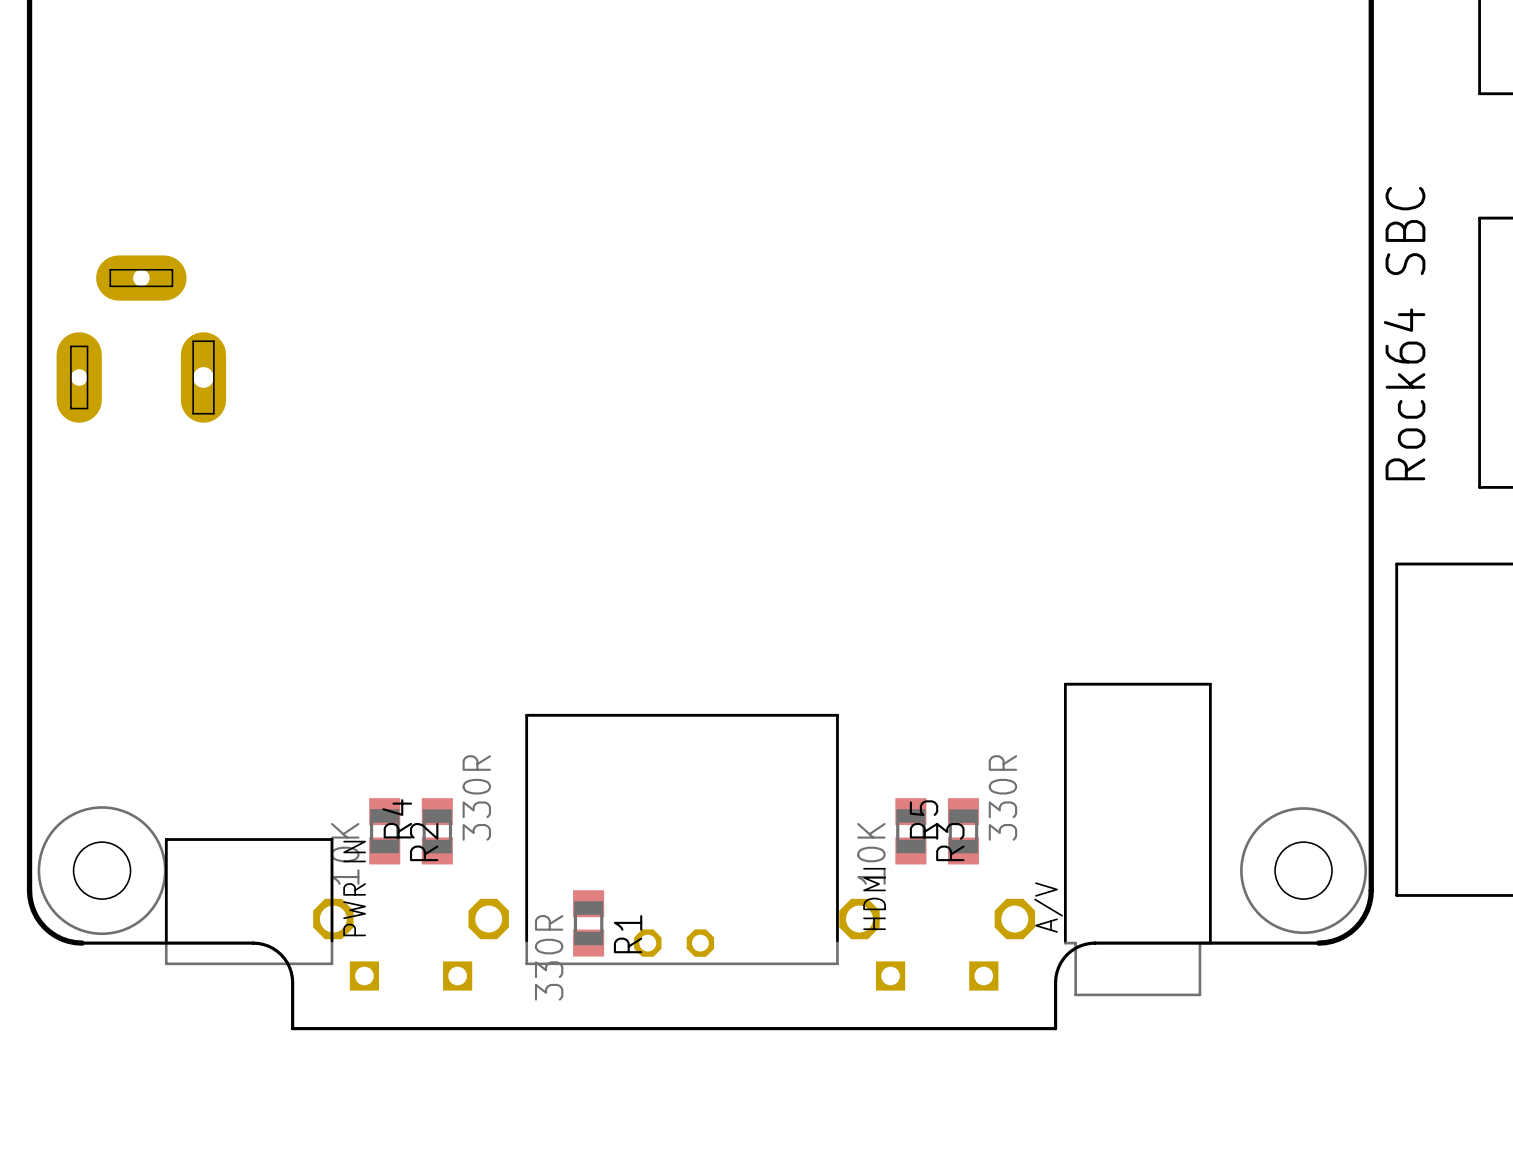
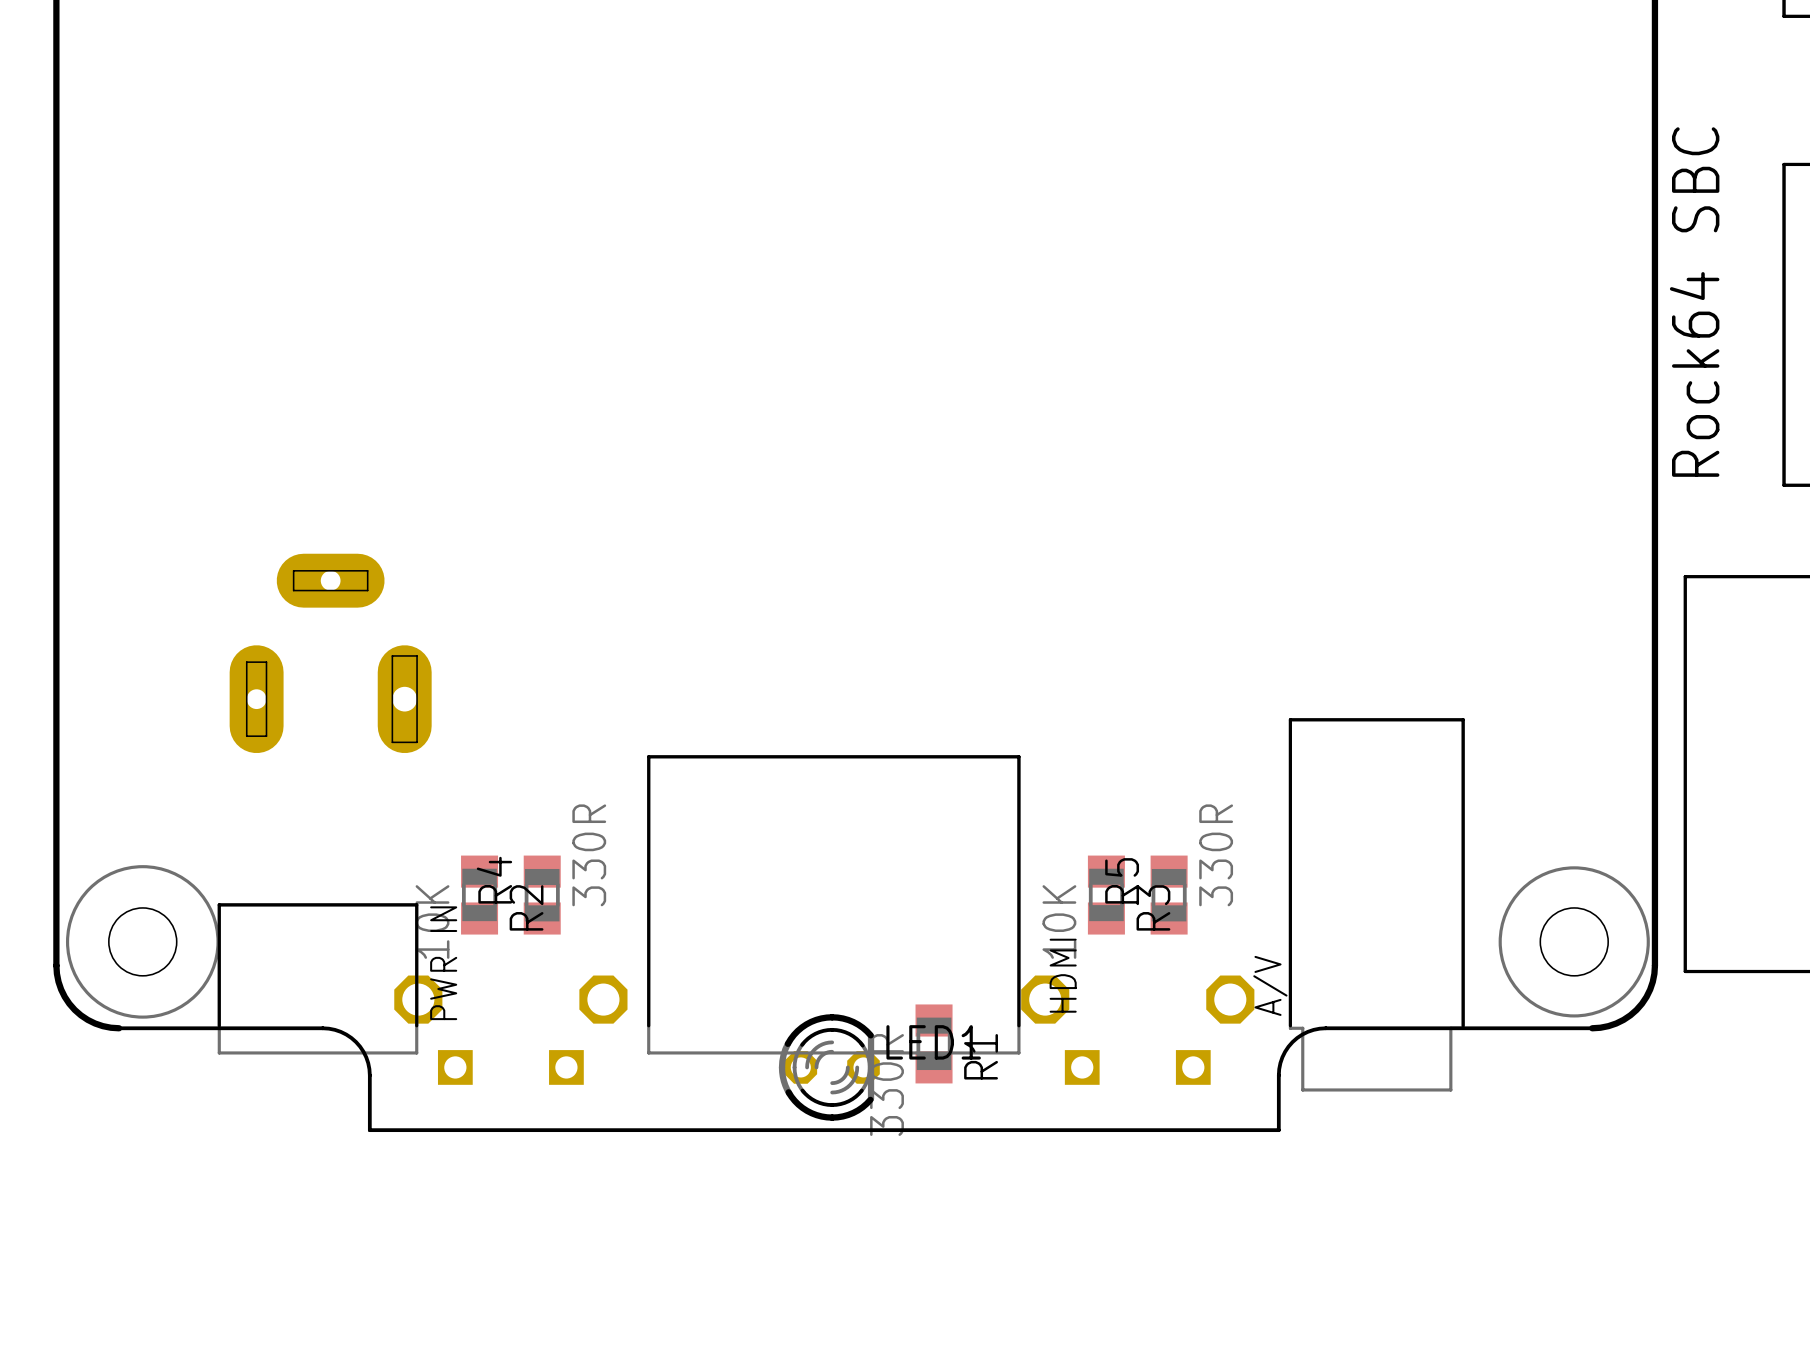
part position: (141, 339) -> (330, 653)
R1 position: (588, 923) -> (934, 1043)
part: (674, 943) -> none
LED1: none -> (829, 1067)

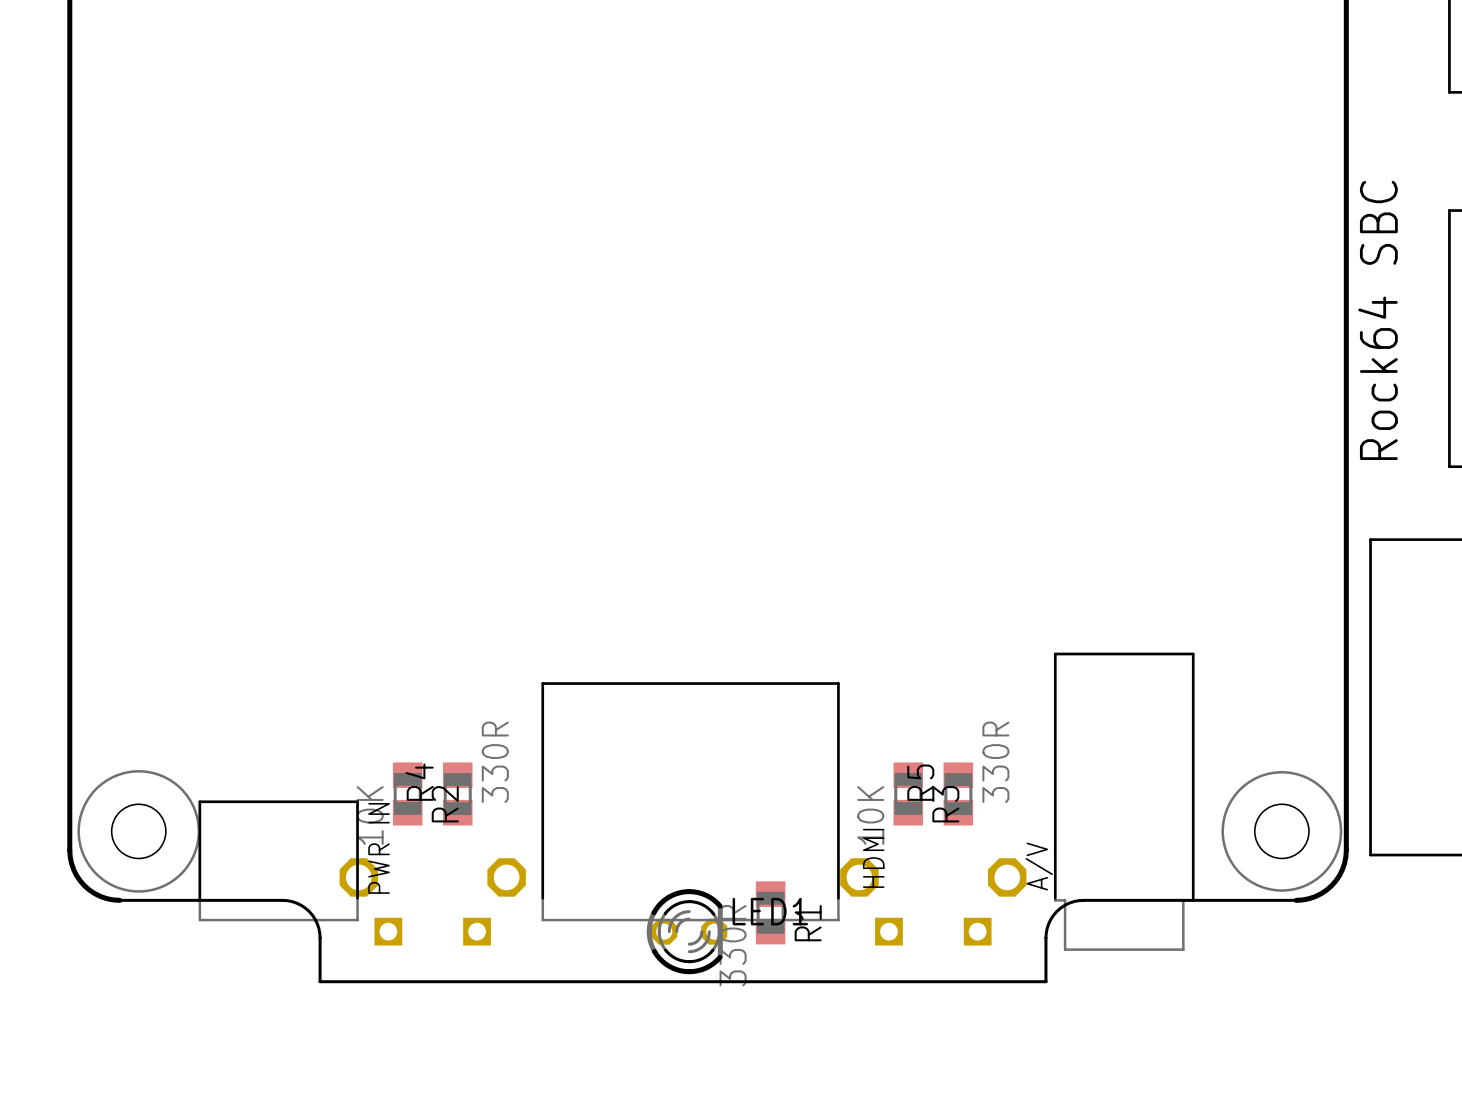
part: (330, 653) -> none

